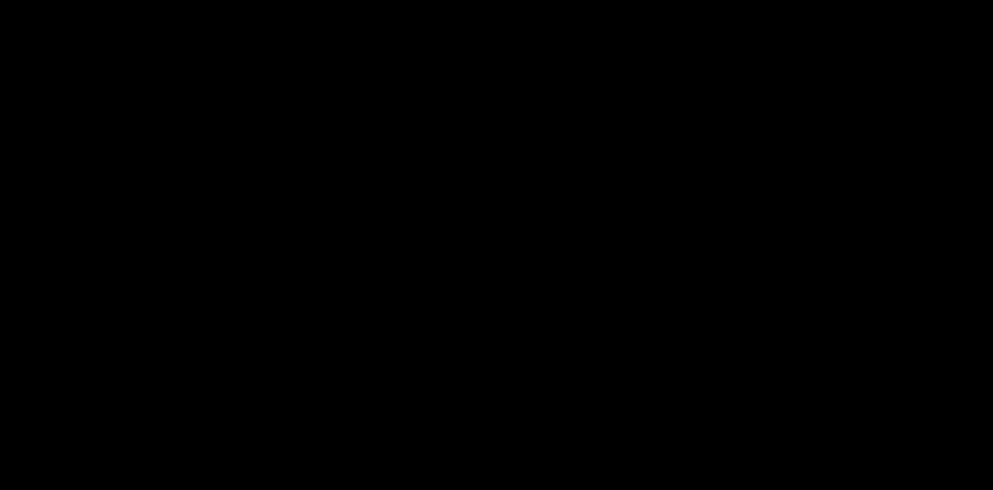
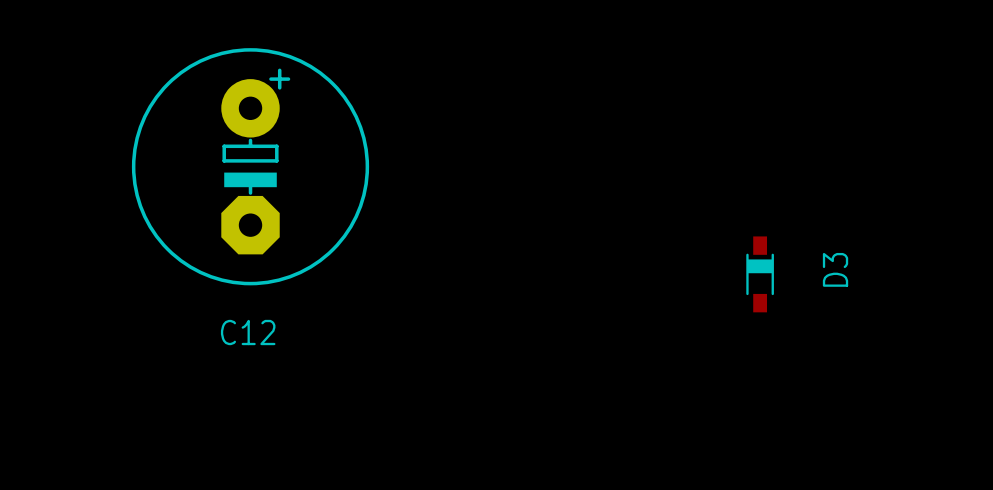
C12: none -> (250, 166)
D3: none -> (760, 274)

